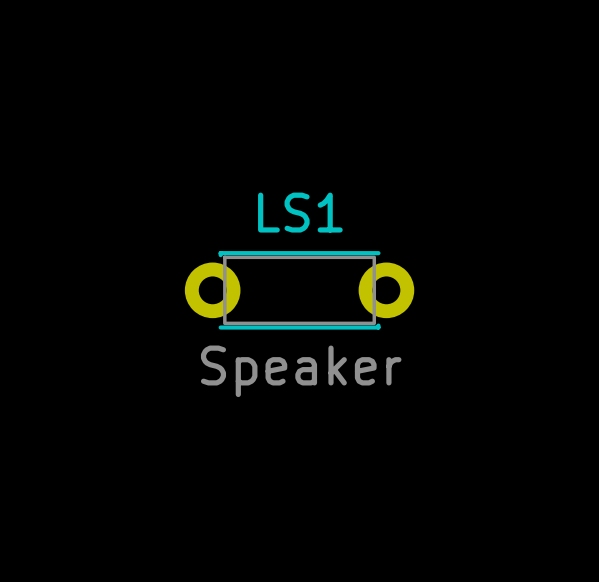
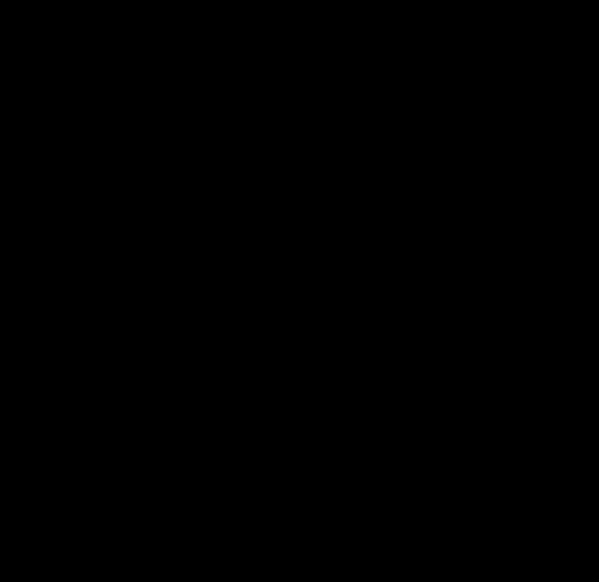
LS1: Speaker (299, 290) -> none

